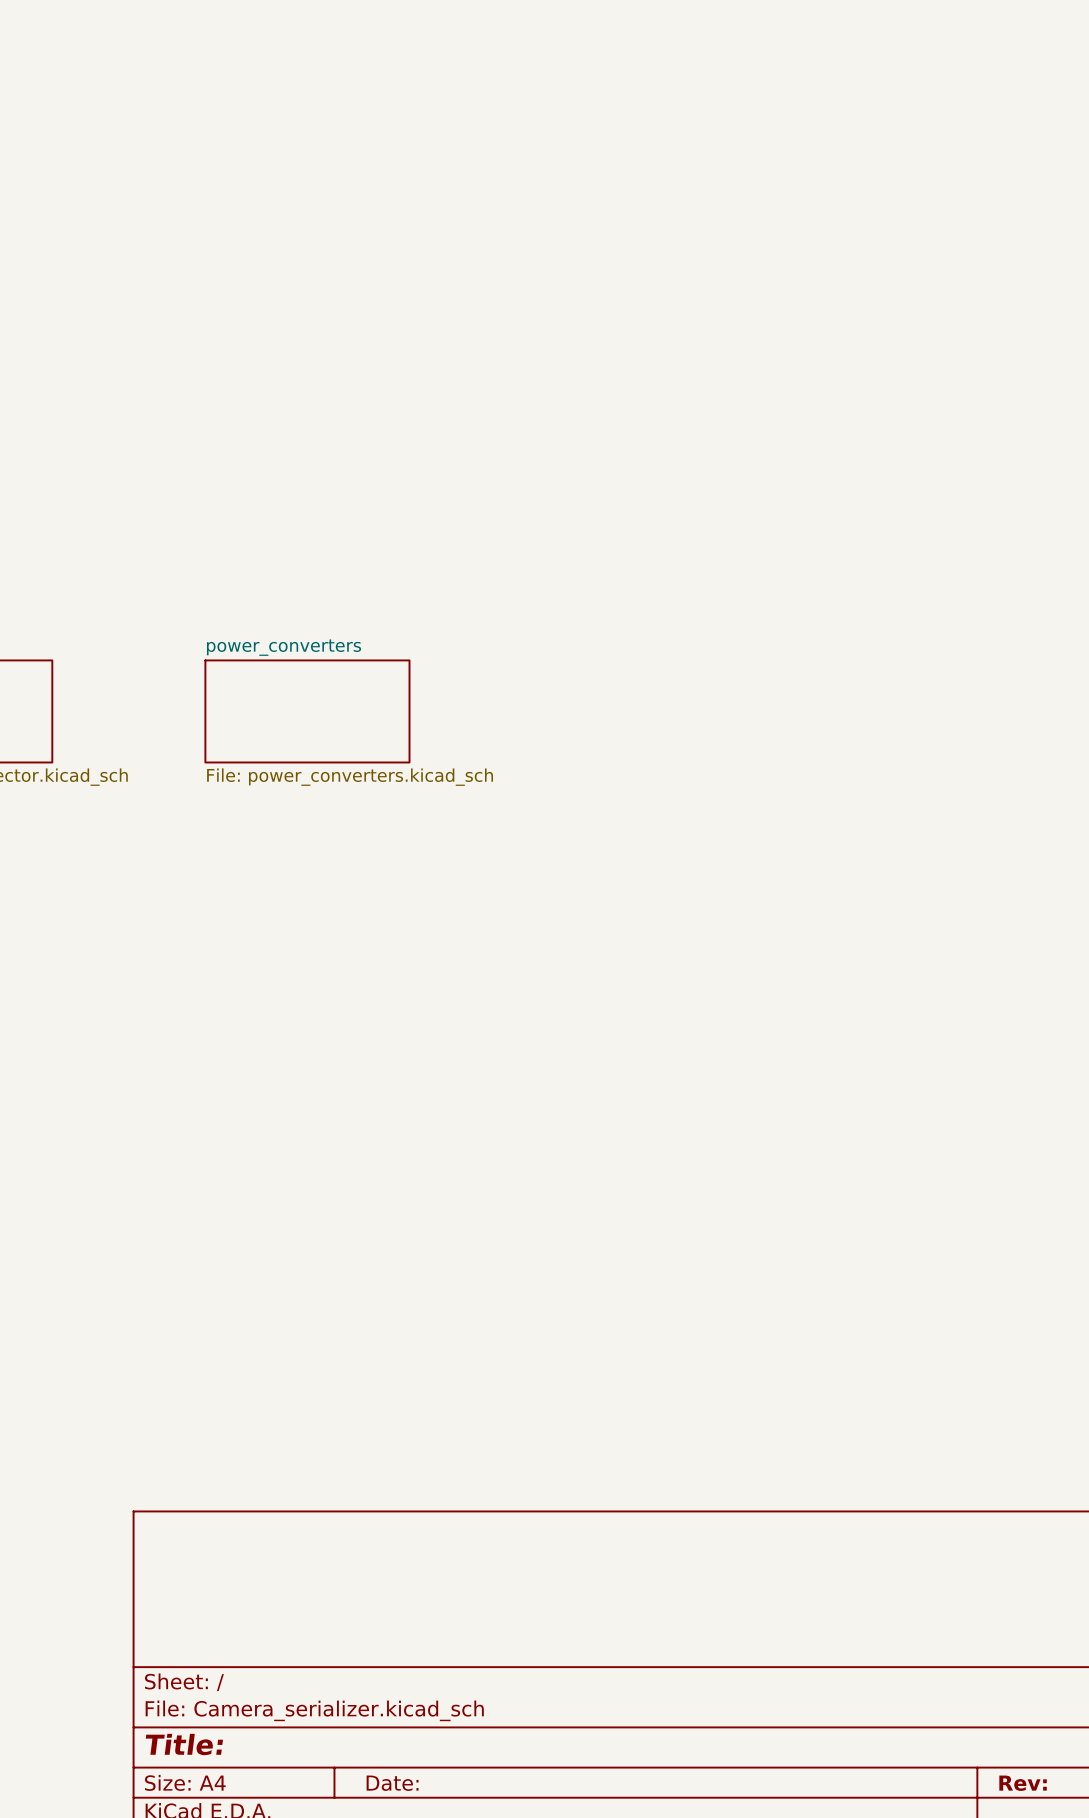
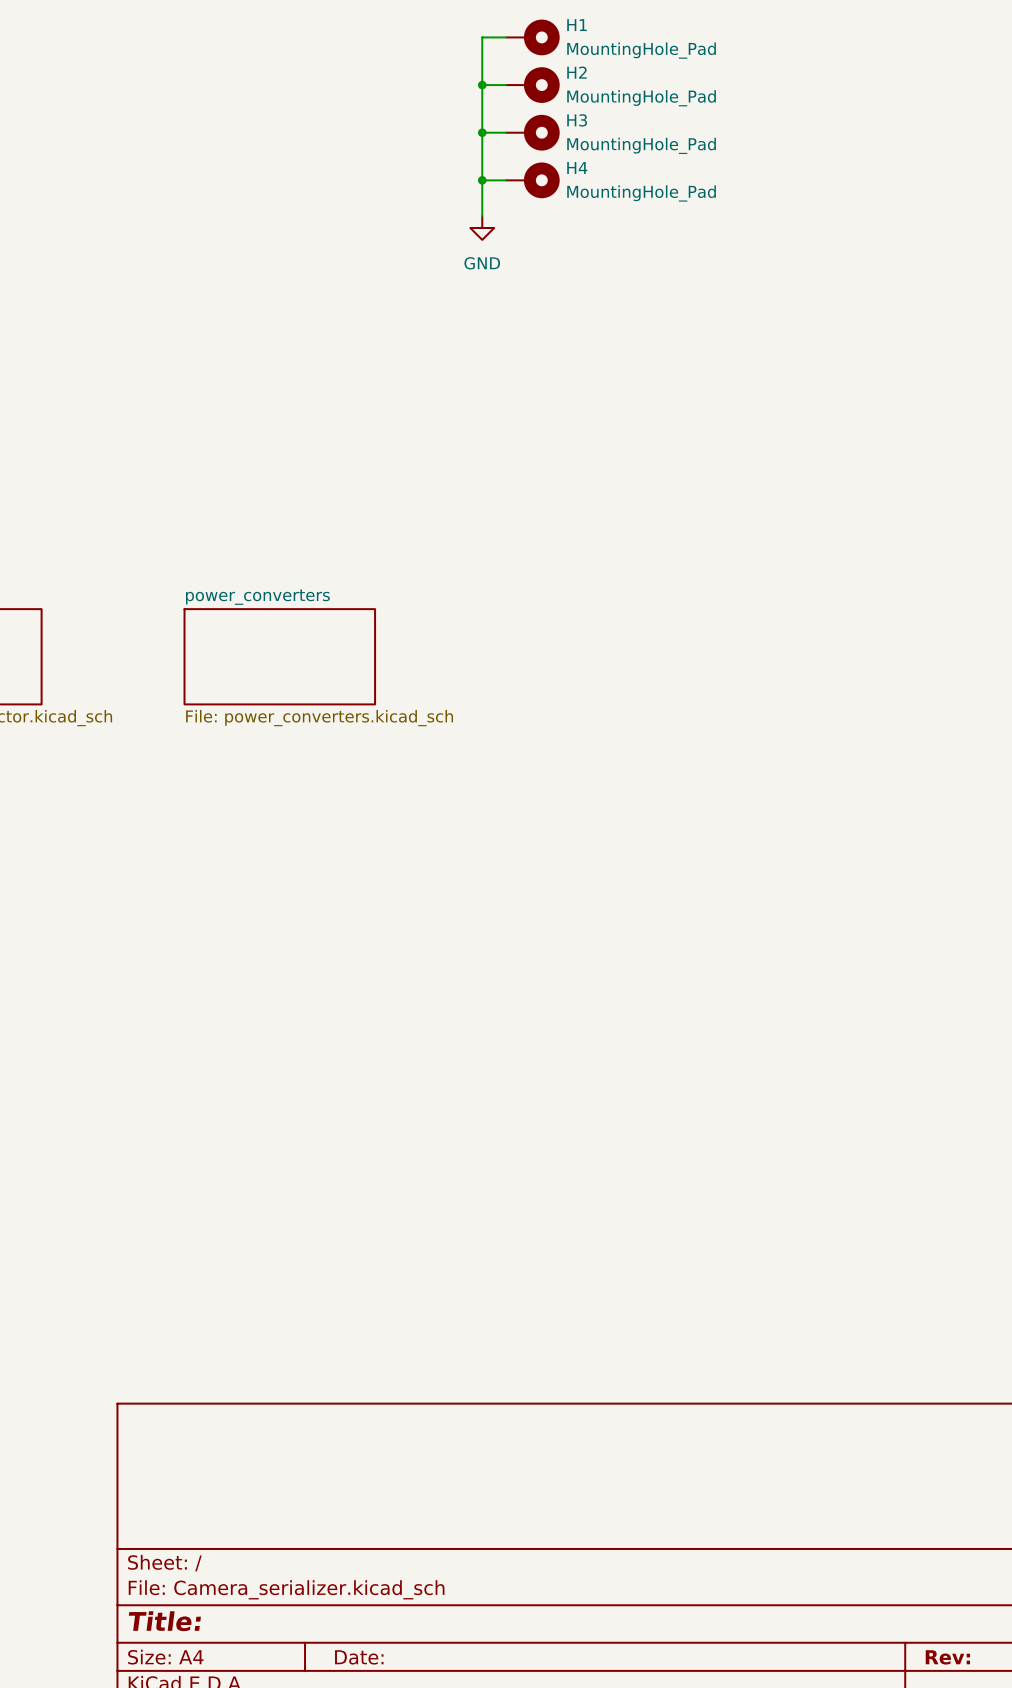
wire: none -> (506, 37) (482, 37) (482, 216)
H1: none -> MountingHole_Pad (532, 37)
wire: none -> (482, 85) (506, 85)
junction: none -> (482, 85)
H2: none -> MountingHole_Pad (532, 85)
wire: none -> (482, 132) (506, 132)
junction: none -> (482, 132)
H3: none -> MountingHole_Pad (532, 132)
wire: none -> (482, 180) (506, 180)
junction: none -> (482, 180)
H4: none -> MountingHole_Pad (532, 180)
power symbol: none -> GND (482, 228)

